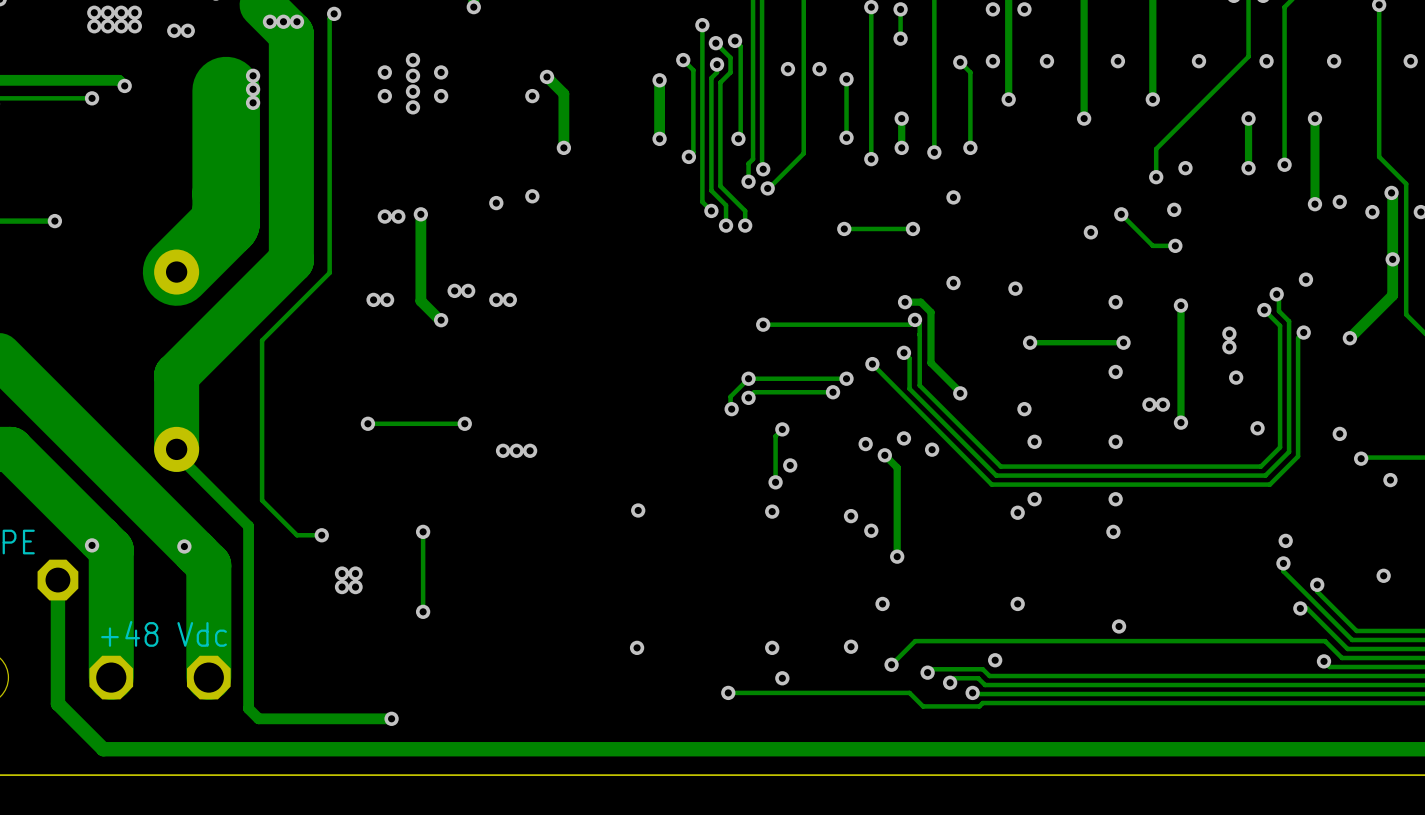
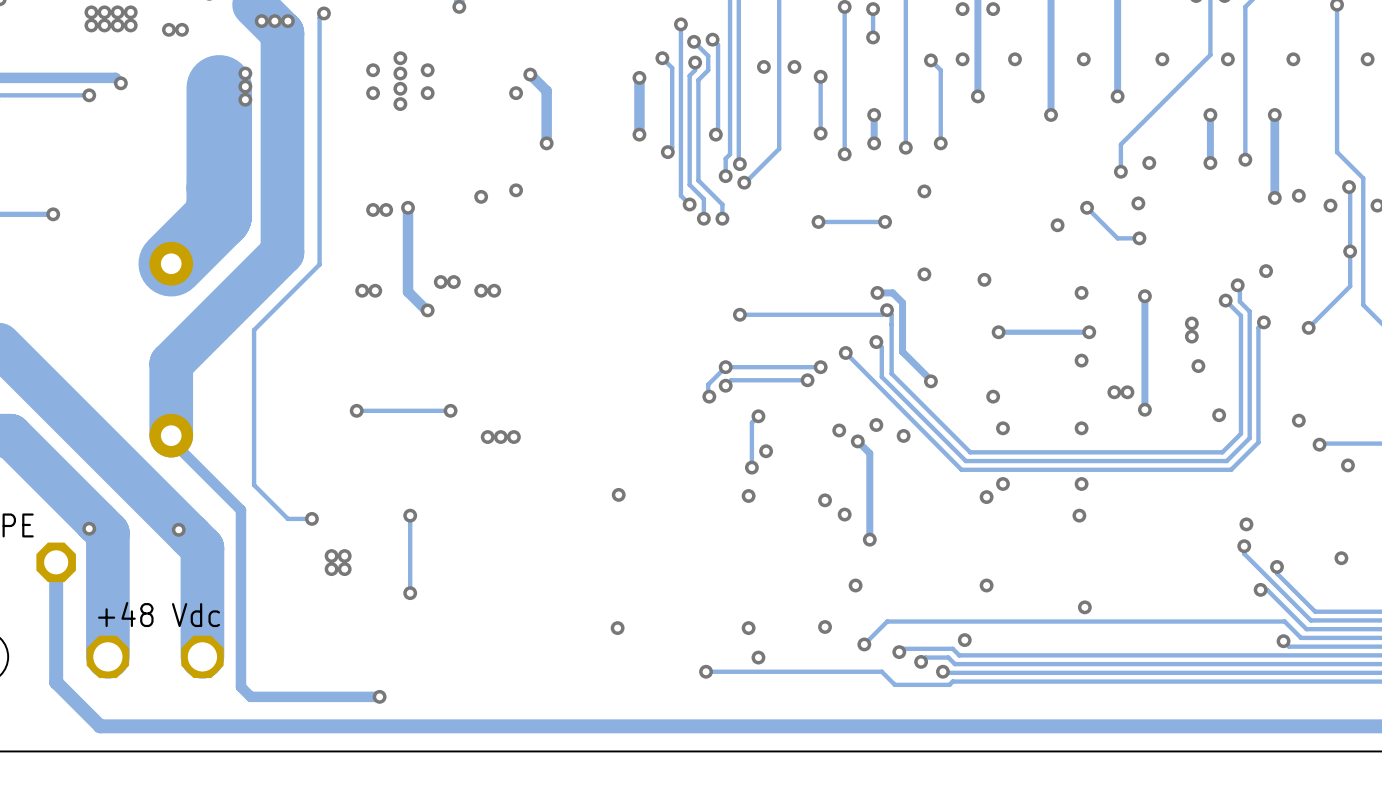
track width: thick (1392, 194) (1392, 295) (1349, 338) -> thin (1350, 188) (1350, 286) (1308, 327)

